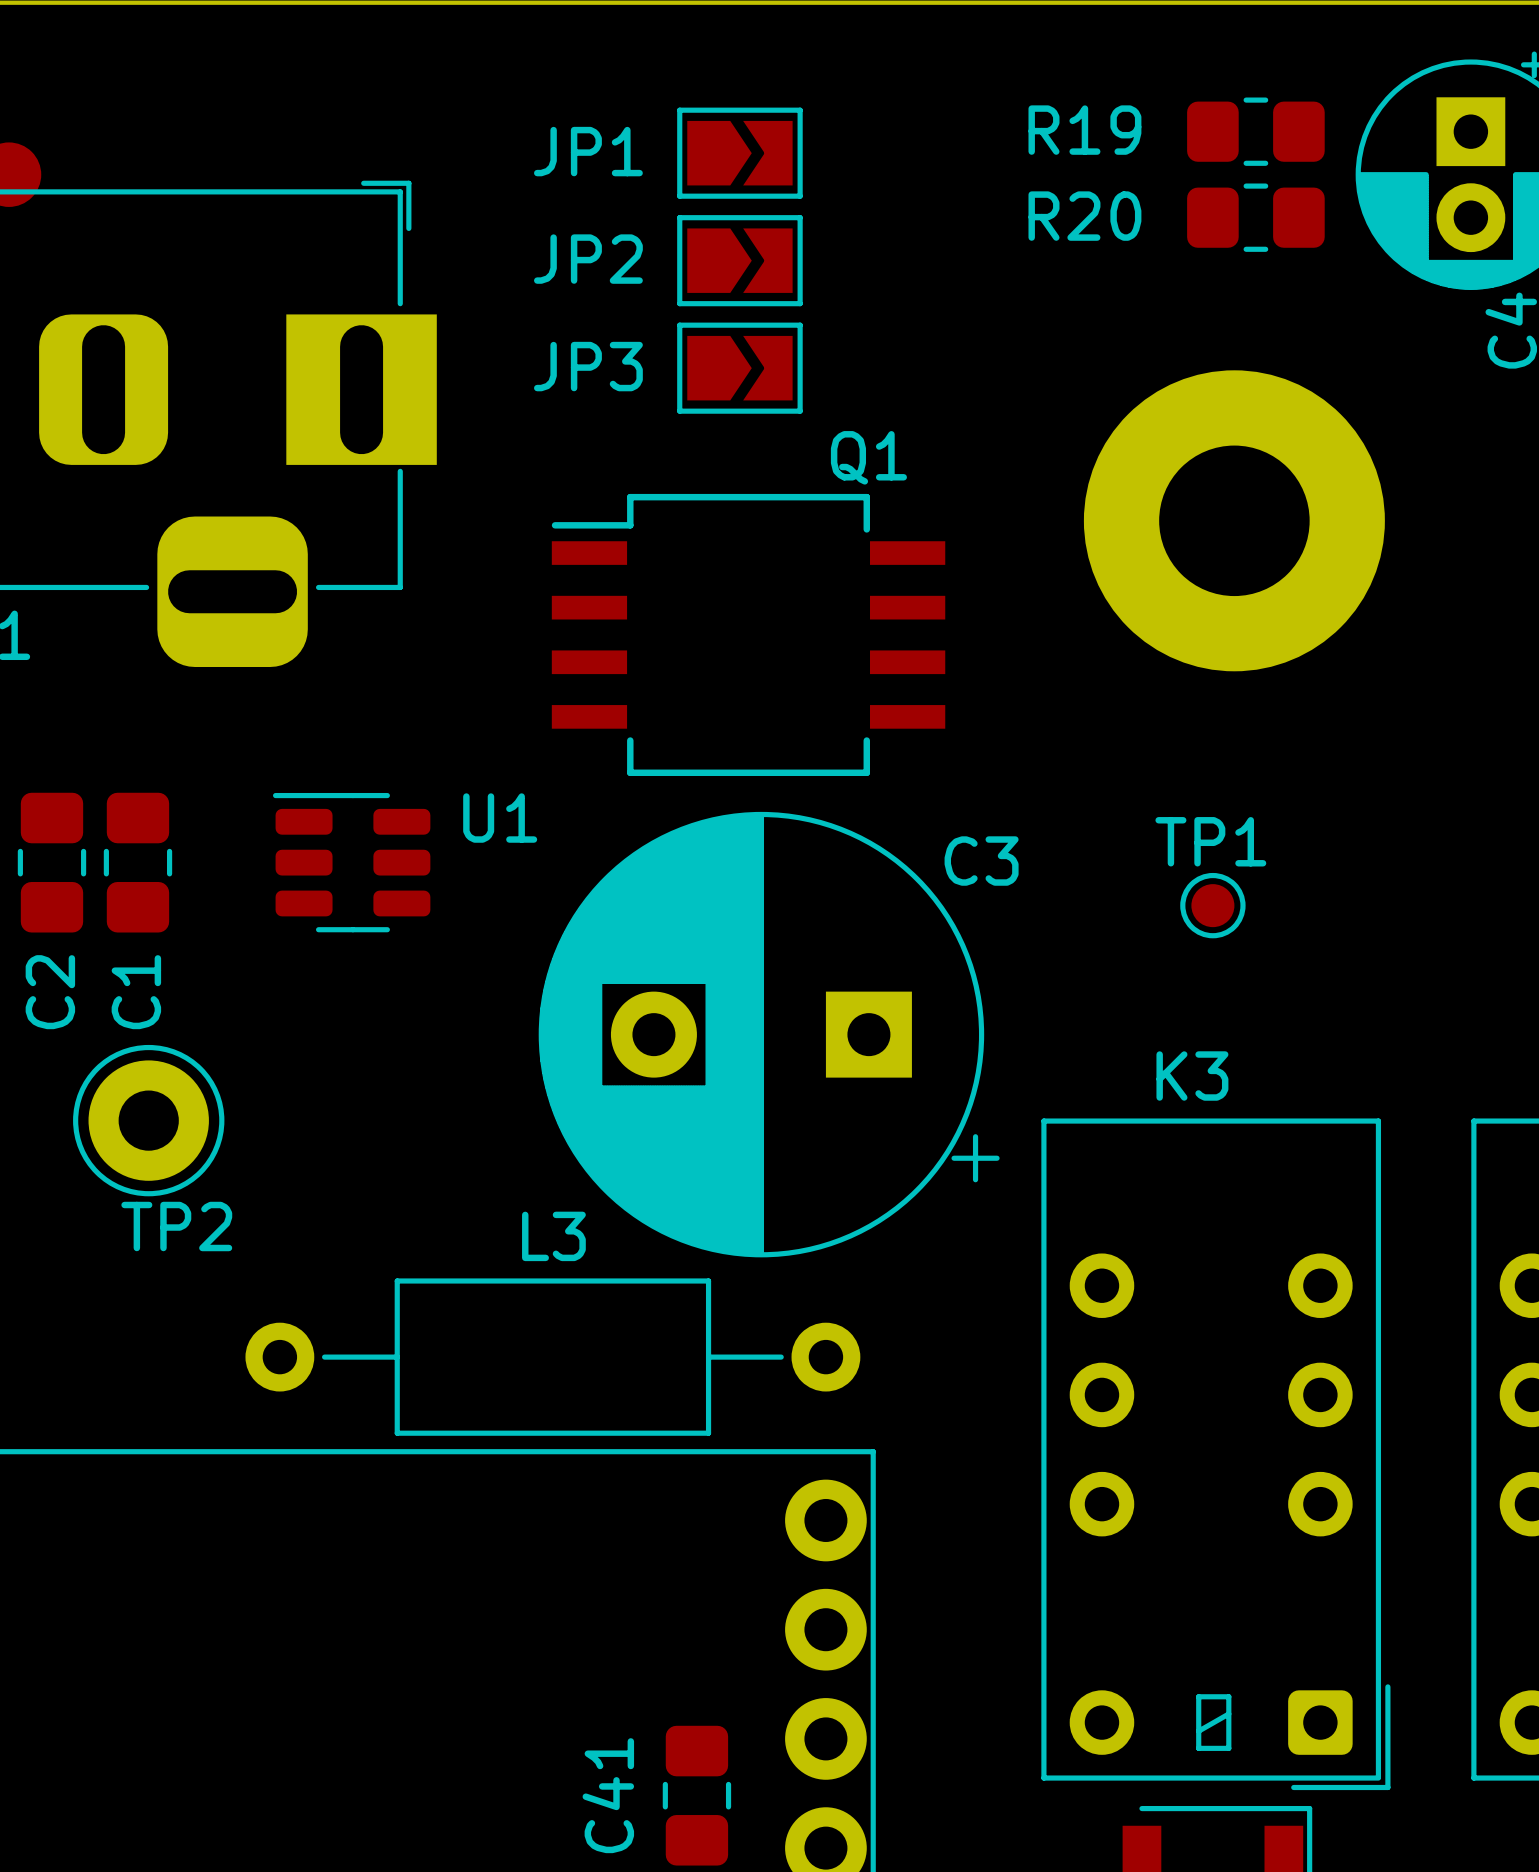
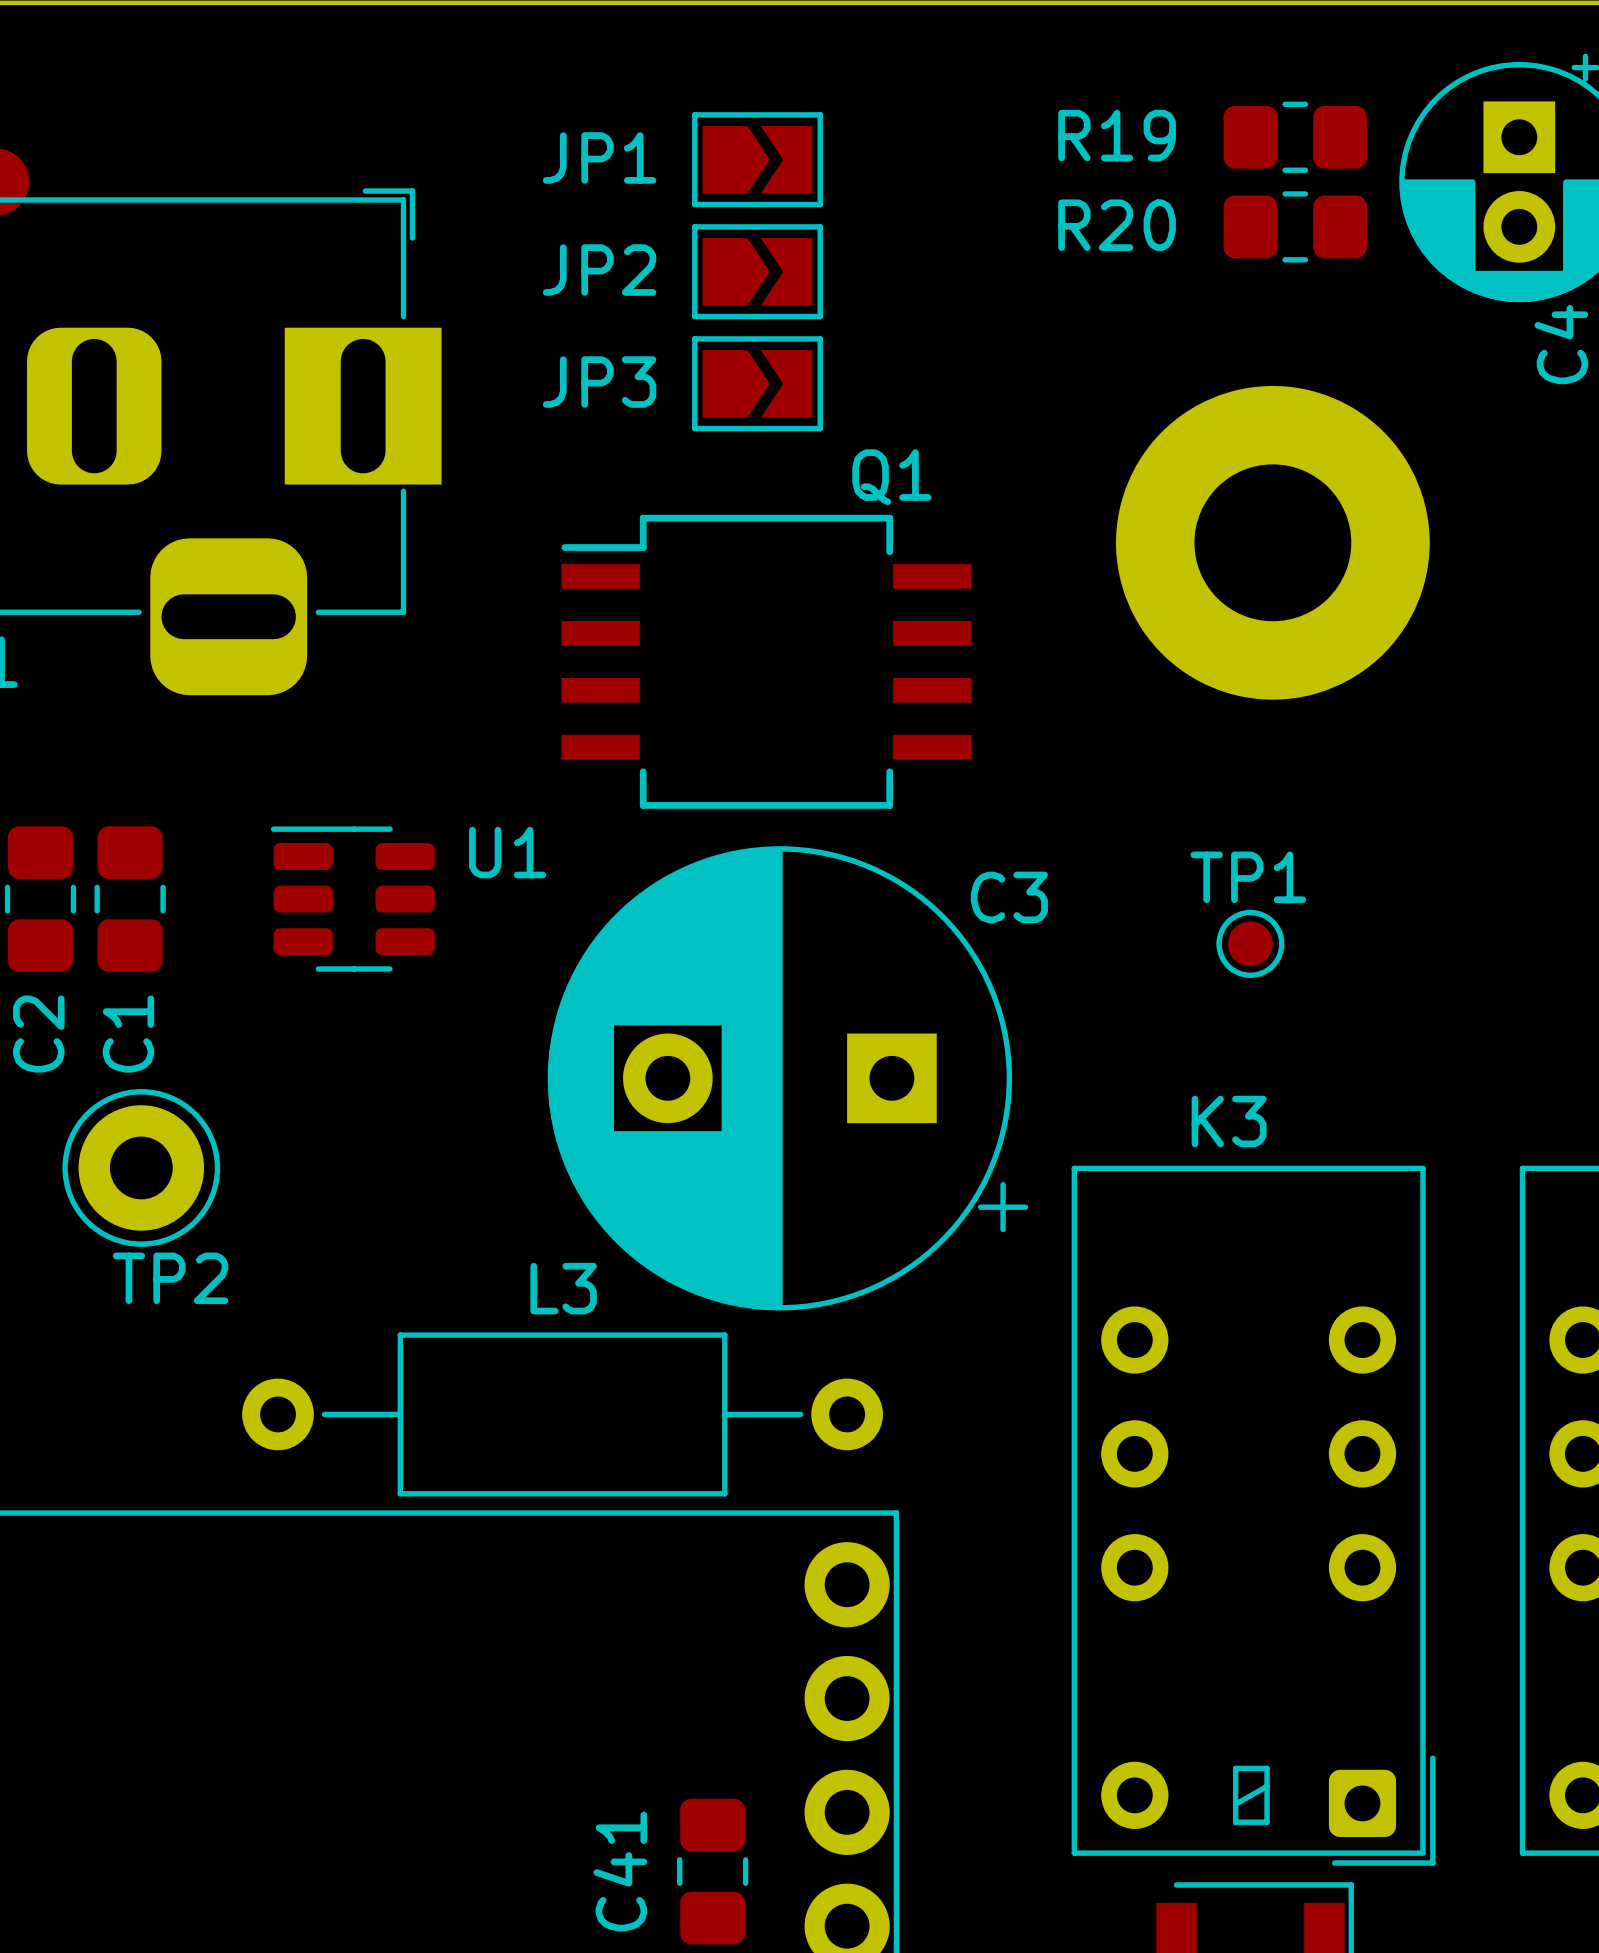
K3 footprint: [1041, 1118, 1391, 1791] -> [1071, 1165, 1436, 1866]

